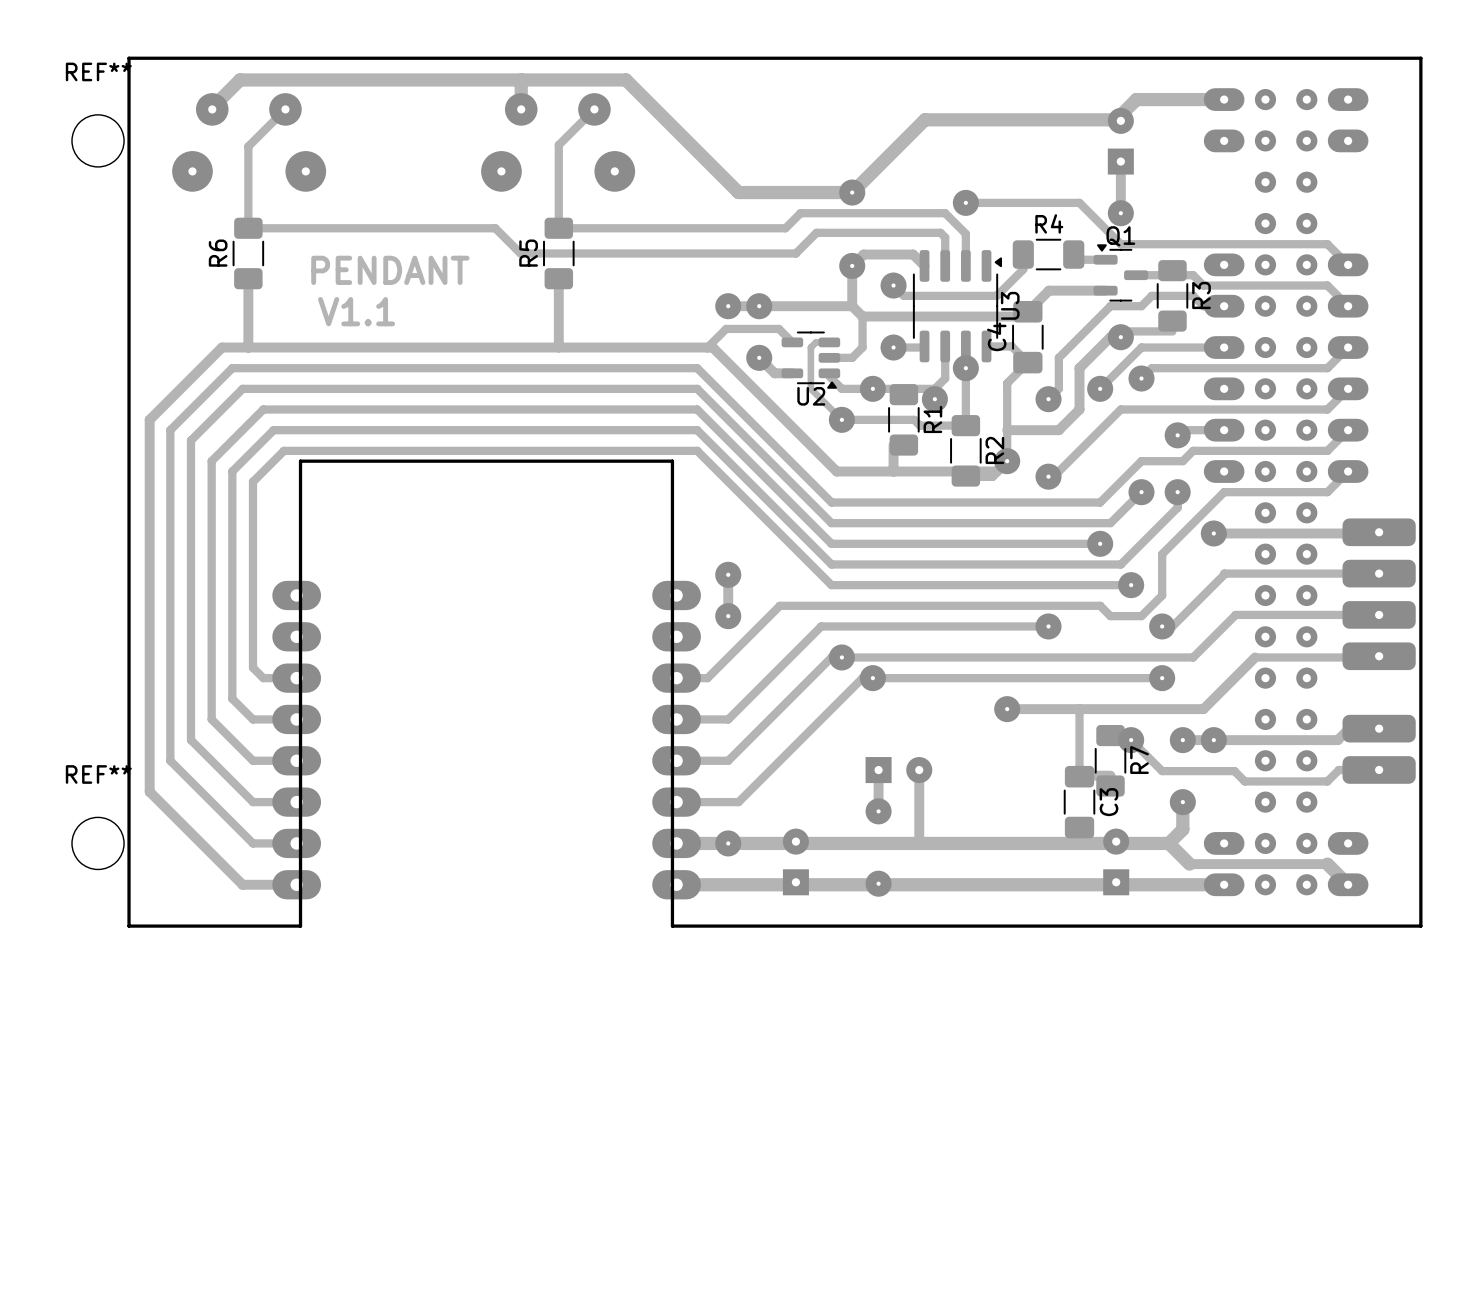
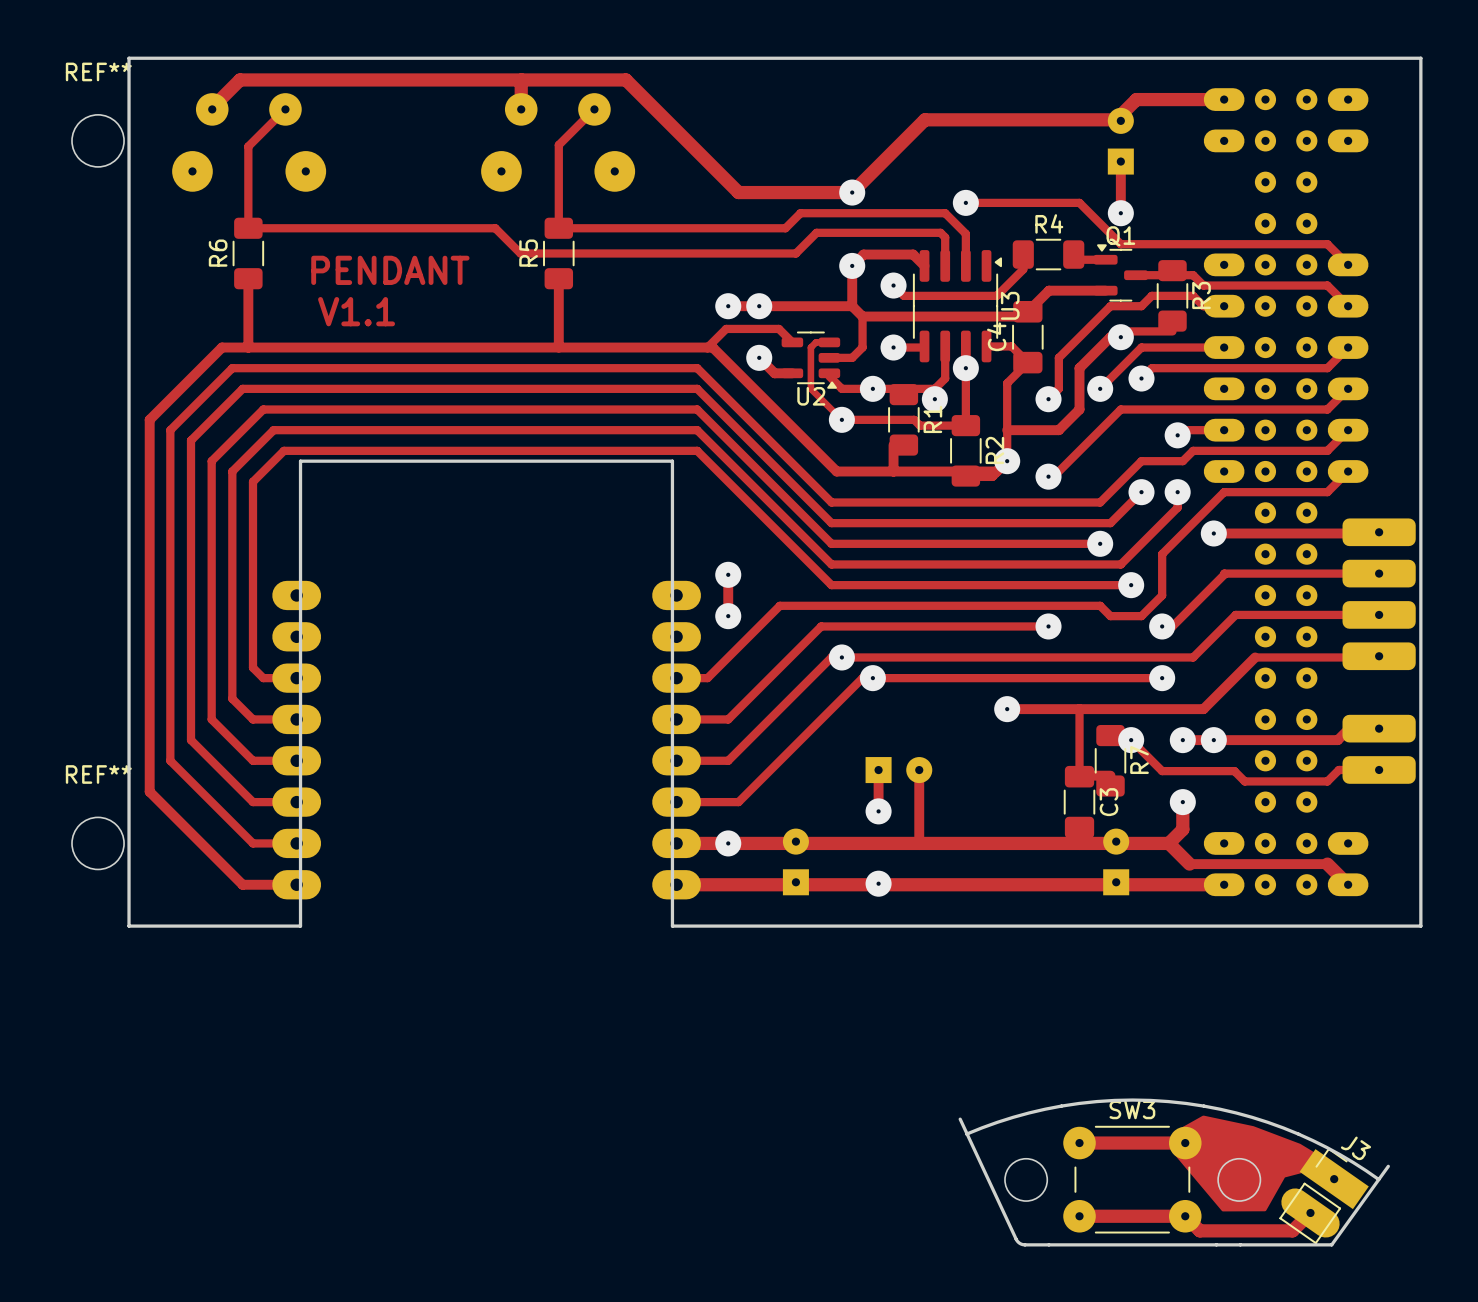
drawing: none -> [1172, 1115, 1335, 1212]
board edge: none -> (960, 1119) (1016, 1239) (1023, 1244) (1331, 1244) (1388, 1166)
board edge: none -> (966, 1134) (1029, 1112) (1079, 1103) (1132, 1100) (1186, 1103) (1236, 1112) (1283, 1127) (1326, 1147) (1378, 1179)
track: none -> (1079, 1143) (1185, 1143)
round board edge: none -> [1004, 1157, 1049, 1202]
round board edge: none -> [1217, 1157, 1262, 1202]
SW3: none -> (1132, 1179)
J3: none -> (1324, 1196)
track: none -> (1310, 1212) (1292, 1230) (1199, 1230) (1185, 1216) (1079, 1216)

